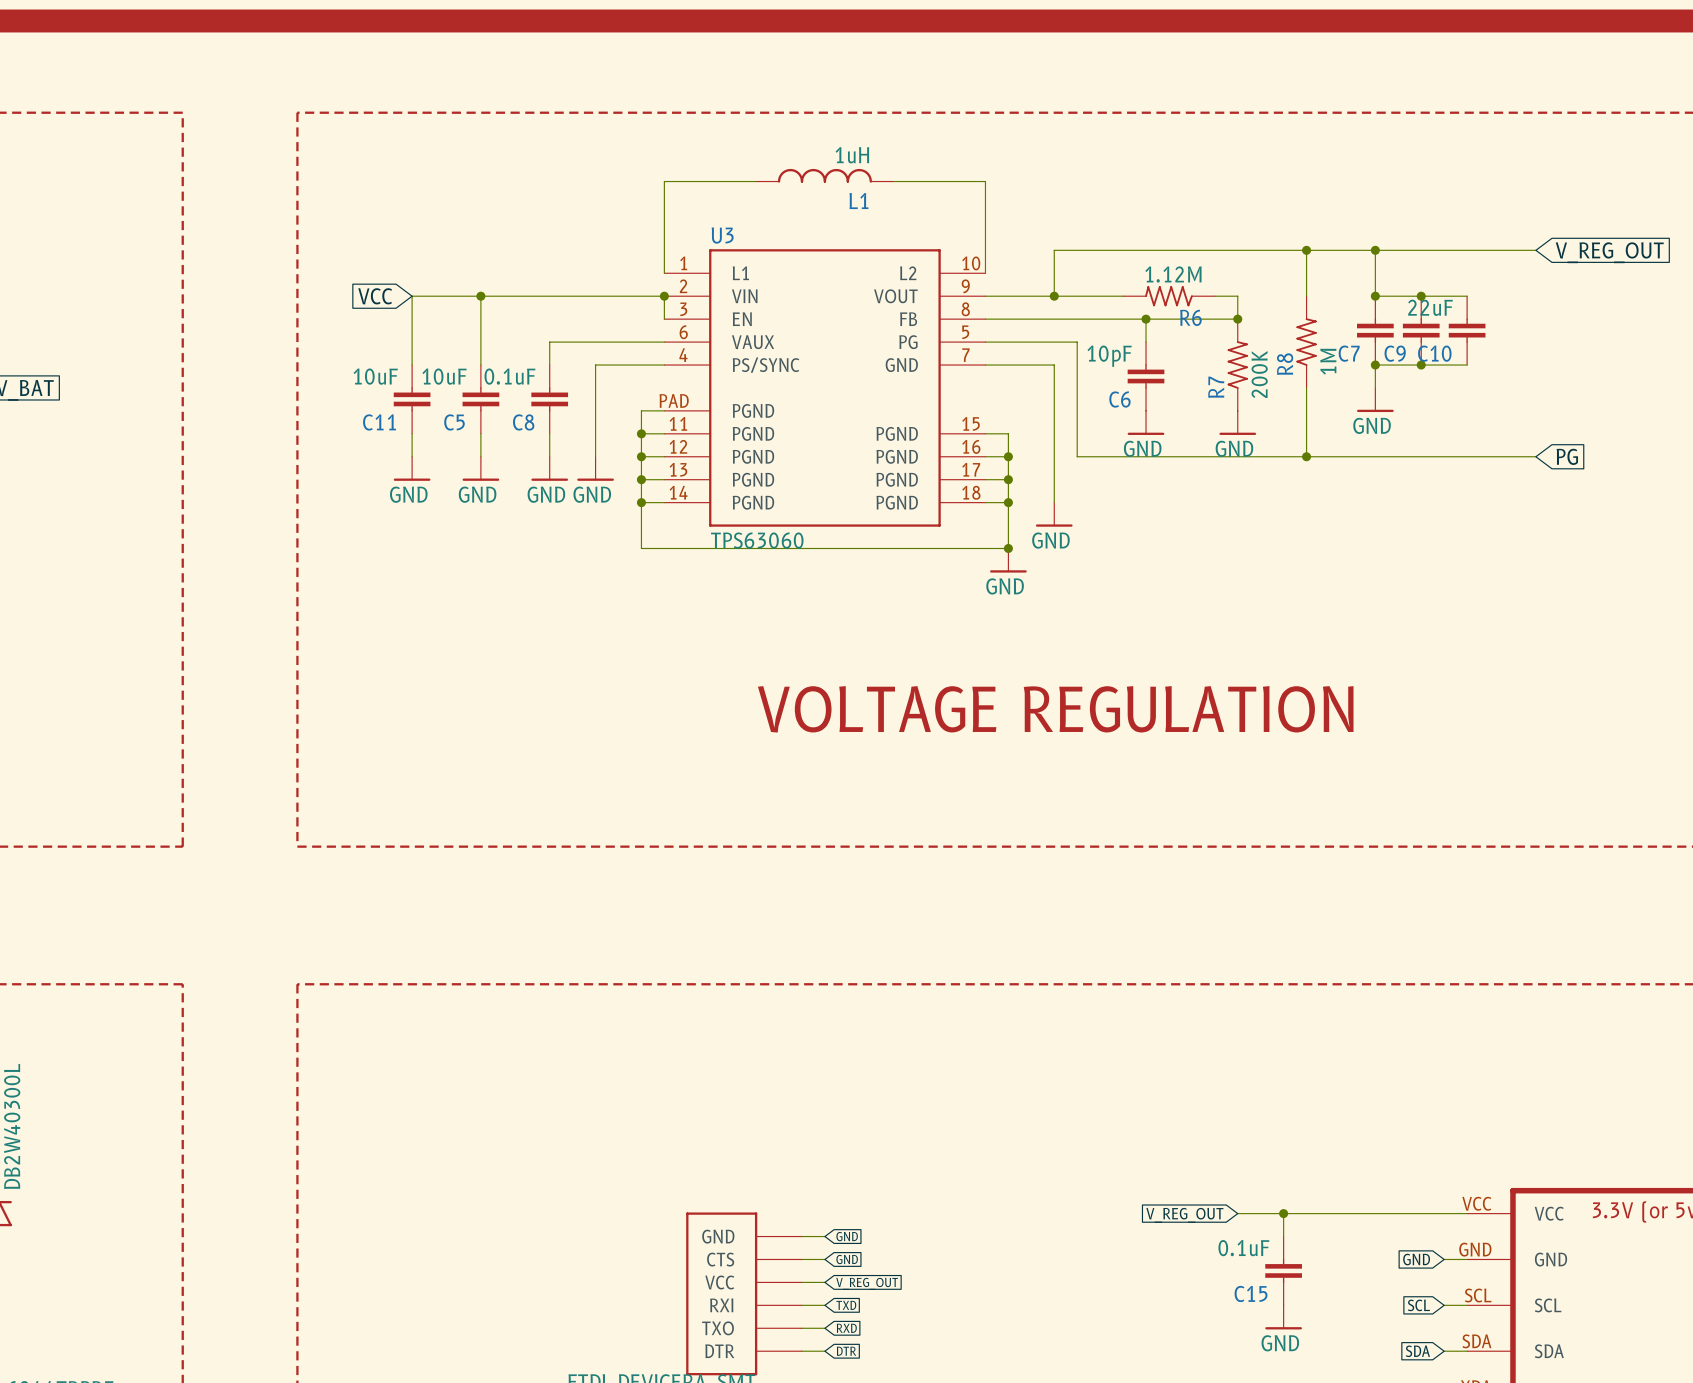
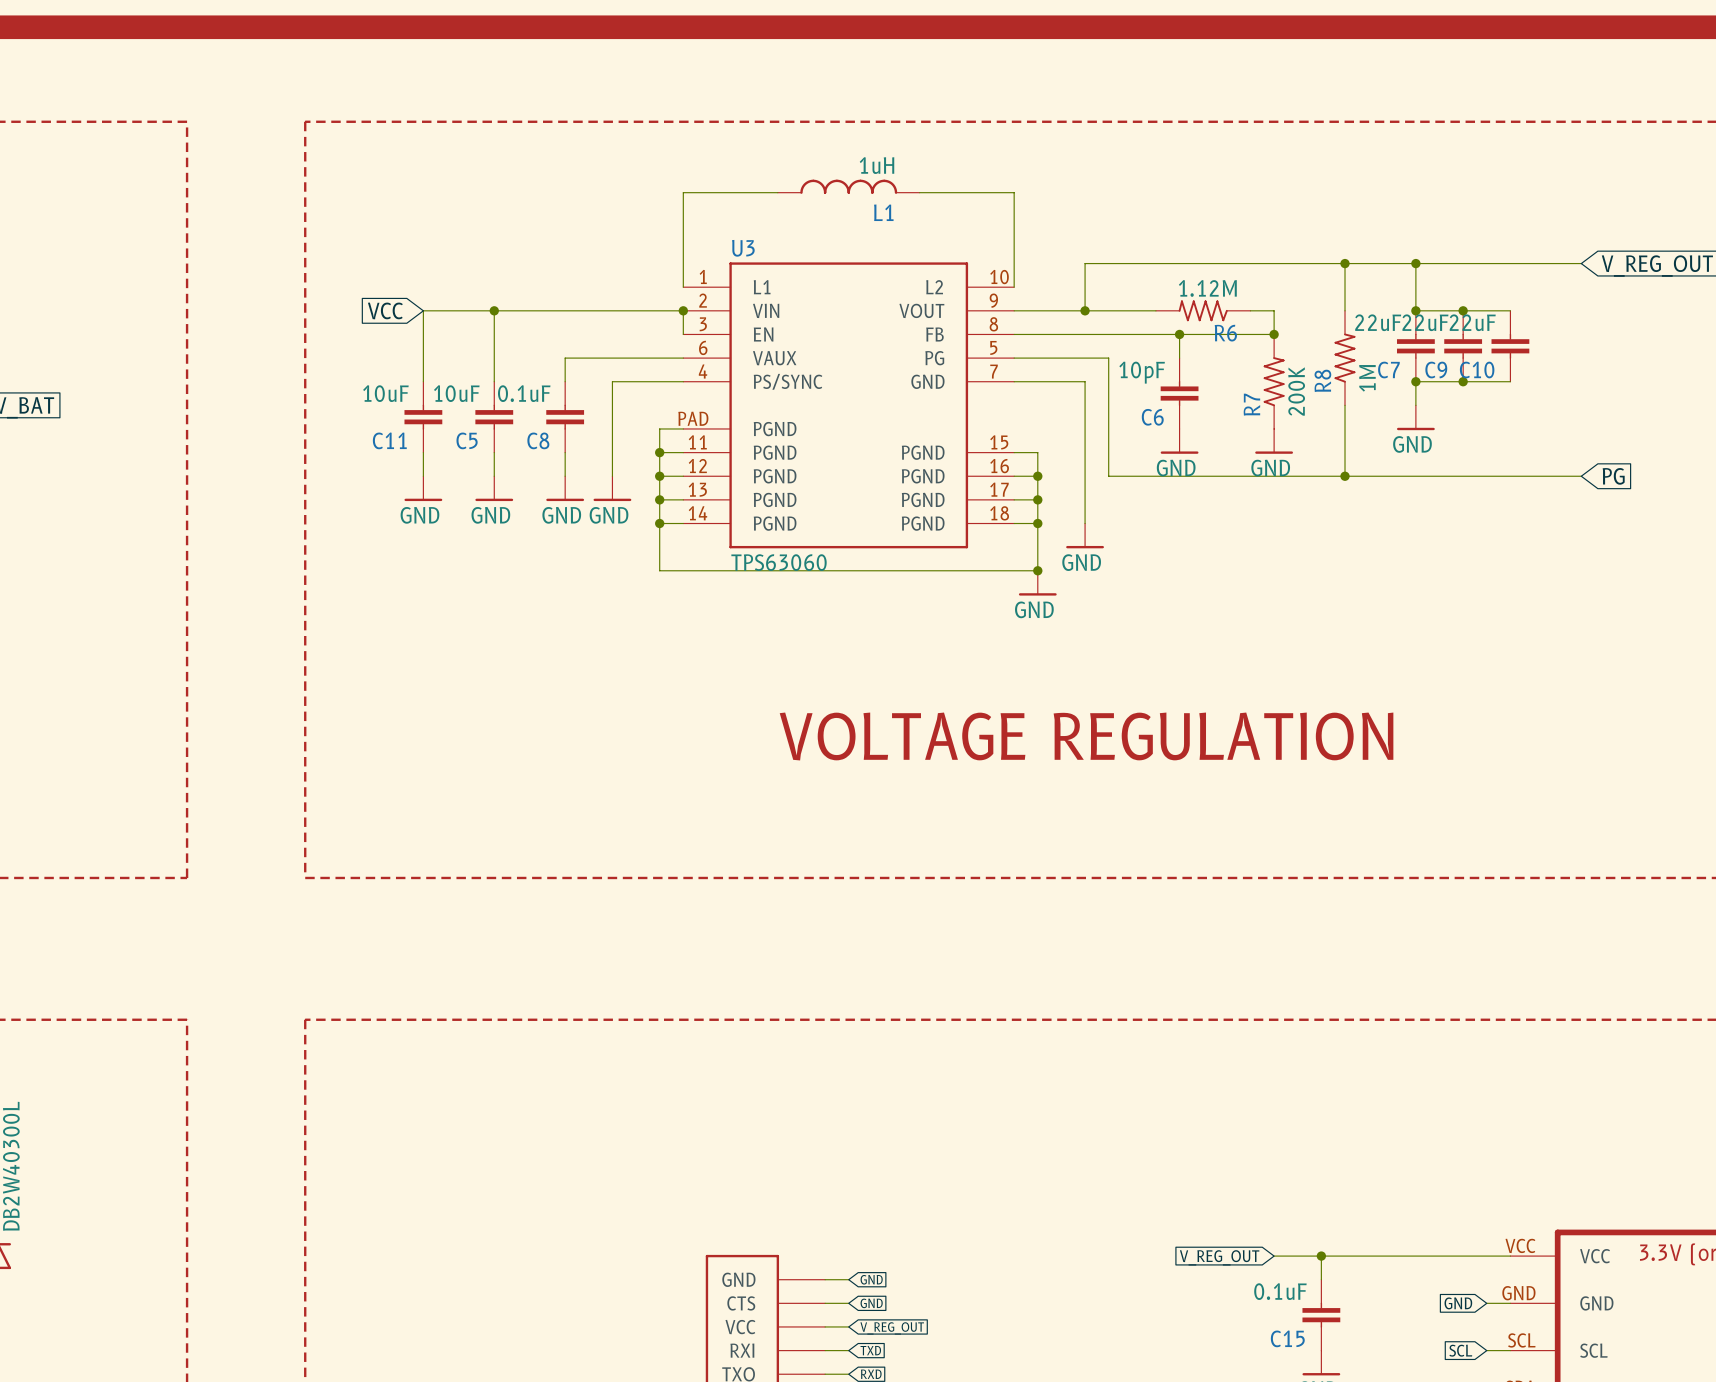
C7 value: none -> 22uF (1378, 322)
C9 value: none -> 22uF (1425, 322)

